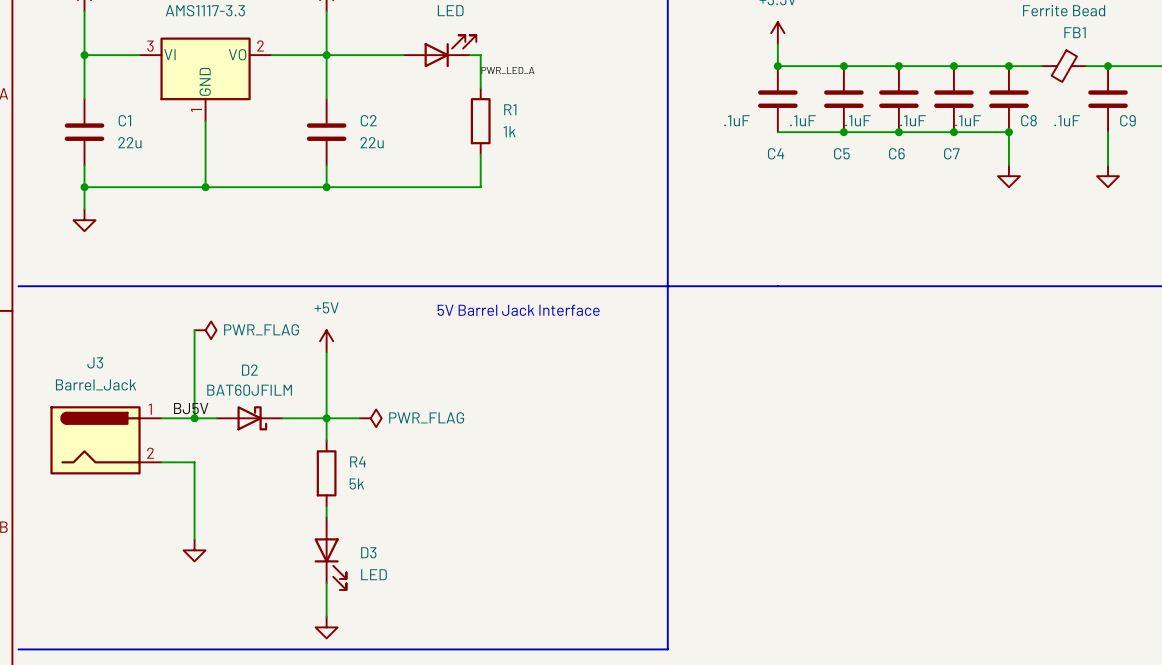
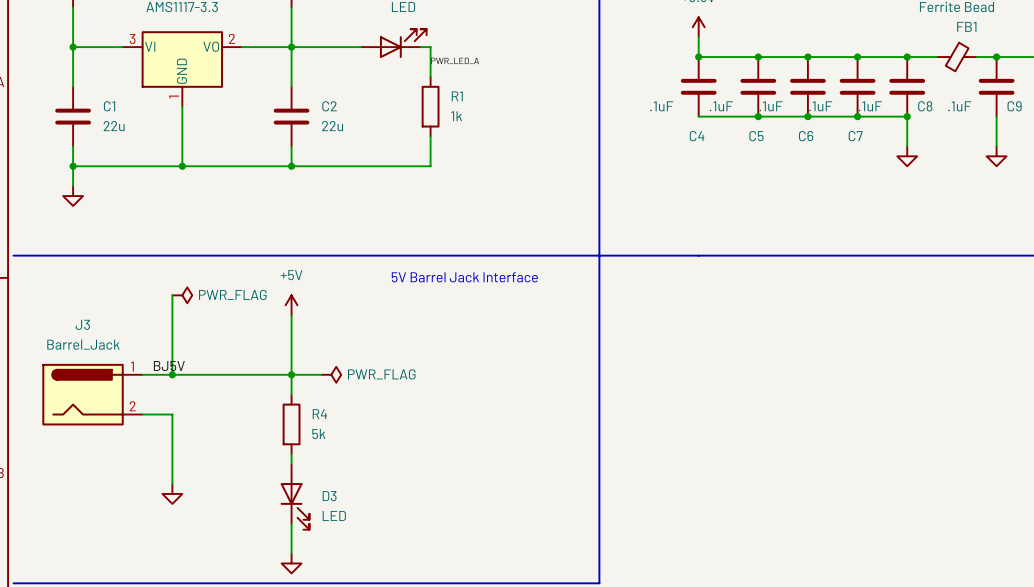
D2: BAT60JFILM (249, 418) -> none

